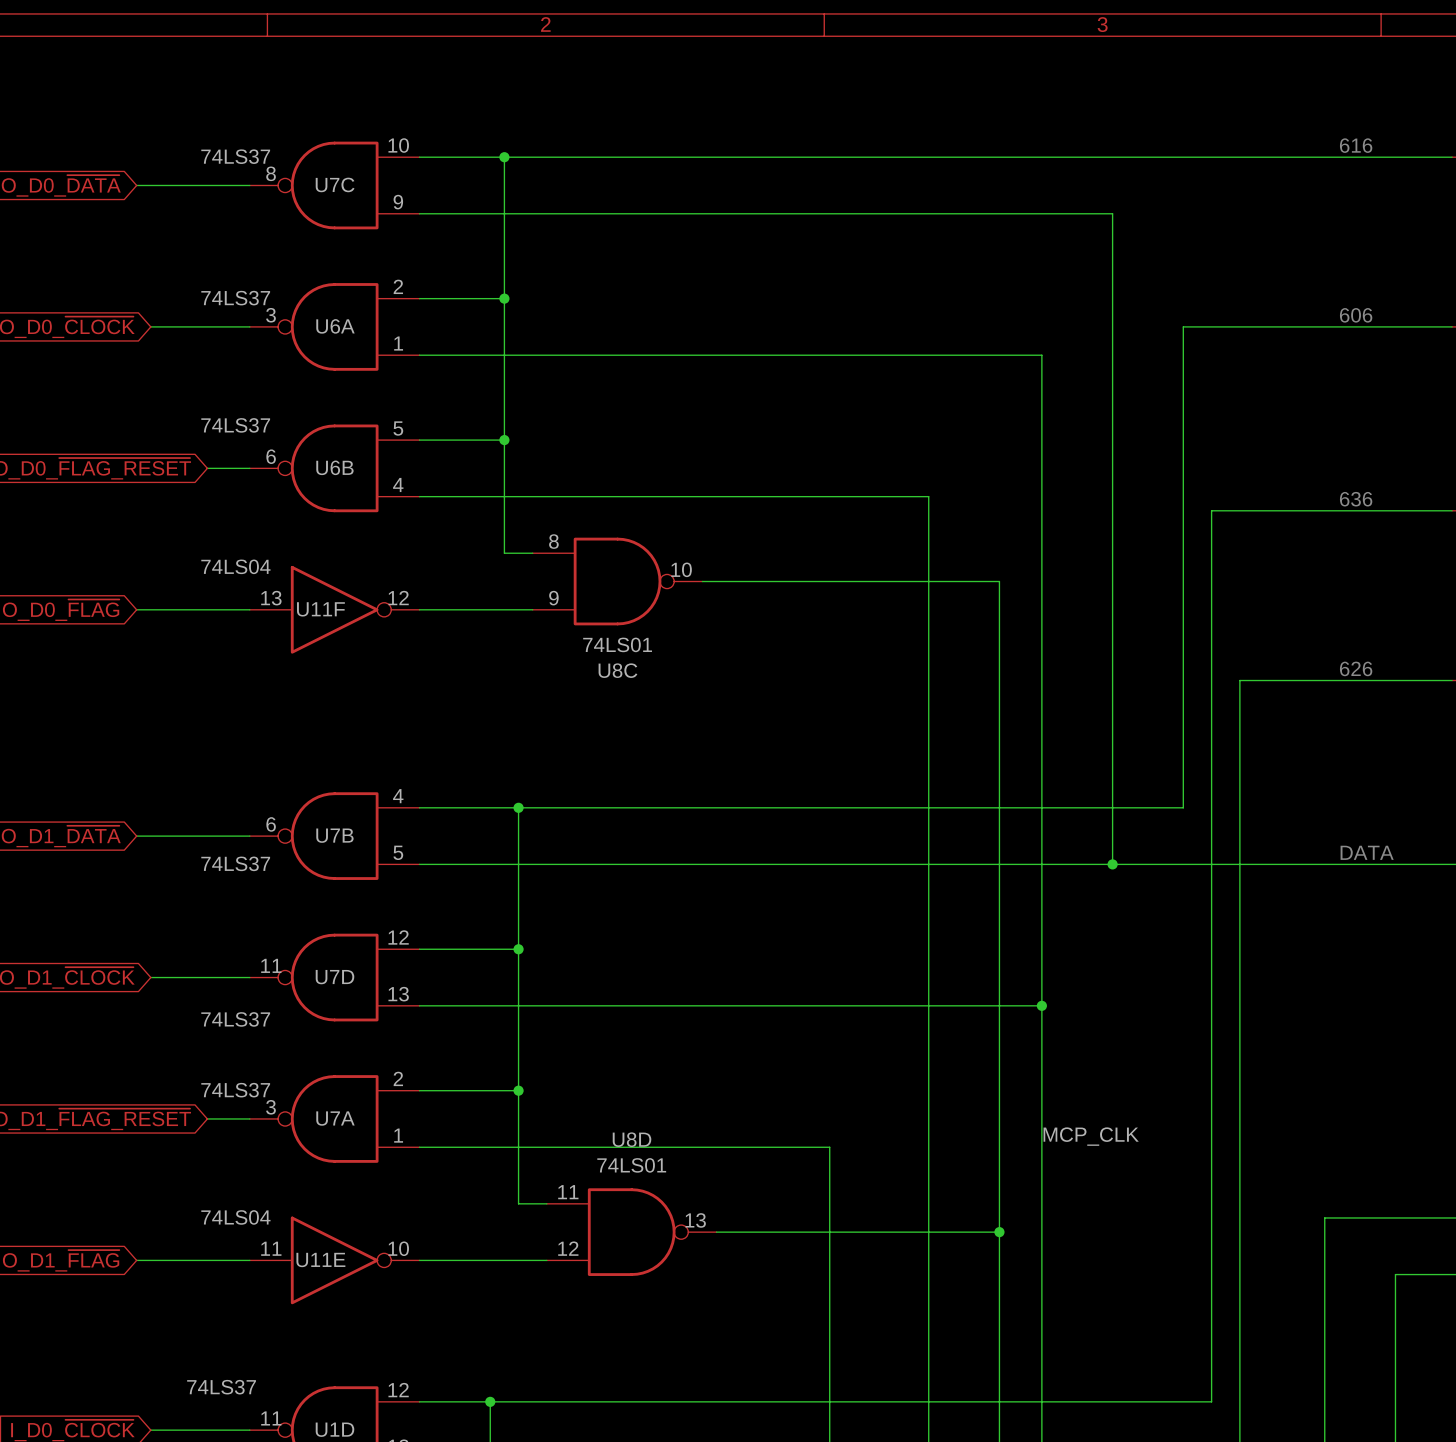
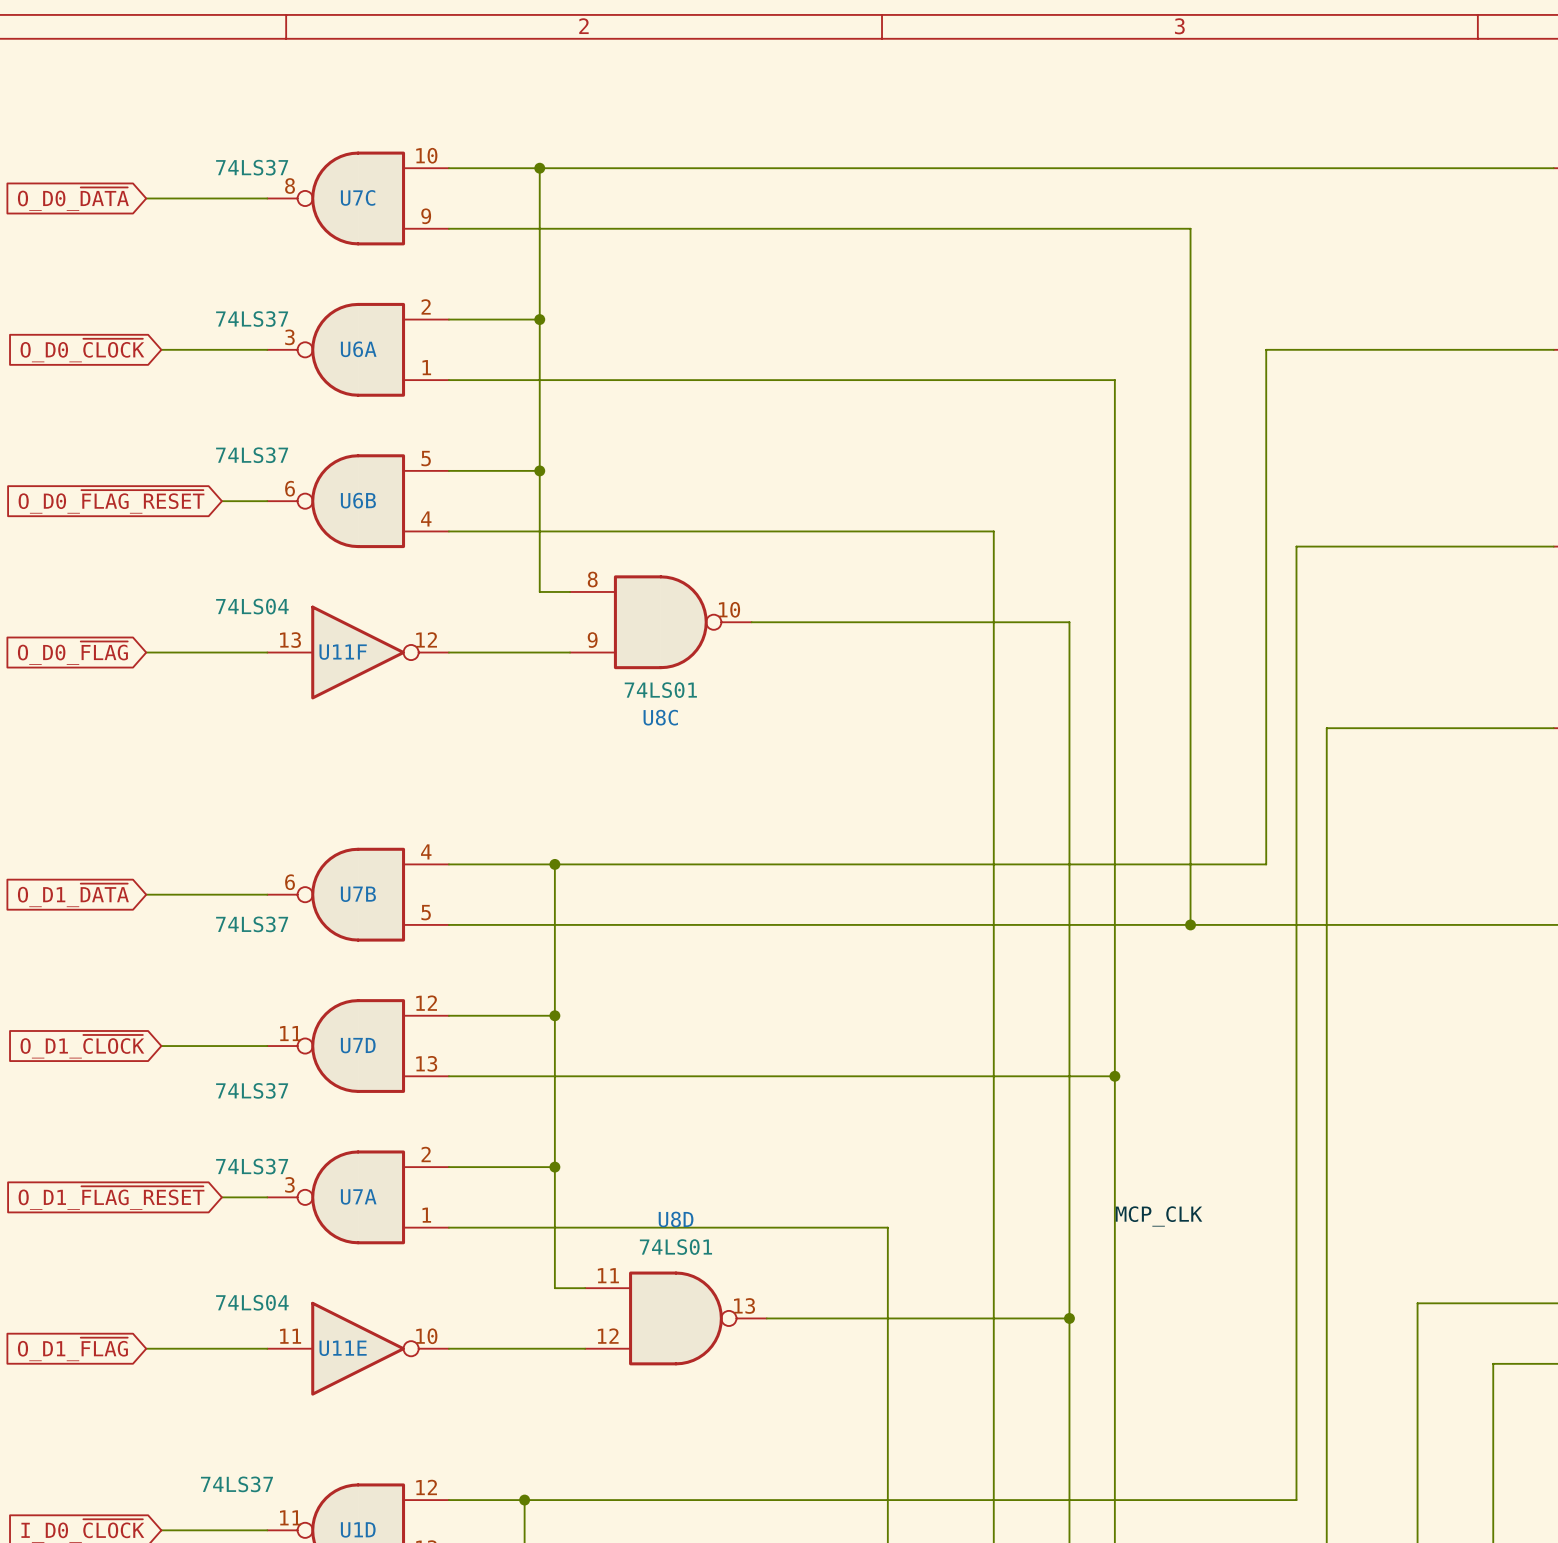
text: 616 (1356, 145) -> none
text: 606 (1356, 315) -> none
text: 636 (1356, 499) -> none
text: 626 (1356, 668) -> none
text: DATA (1367, 852) -> none

